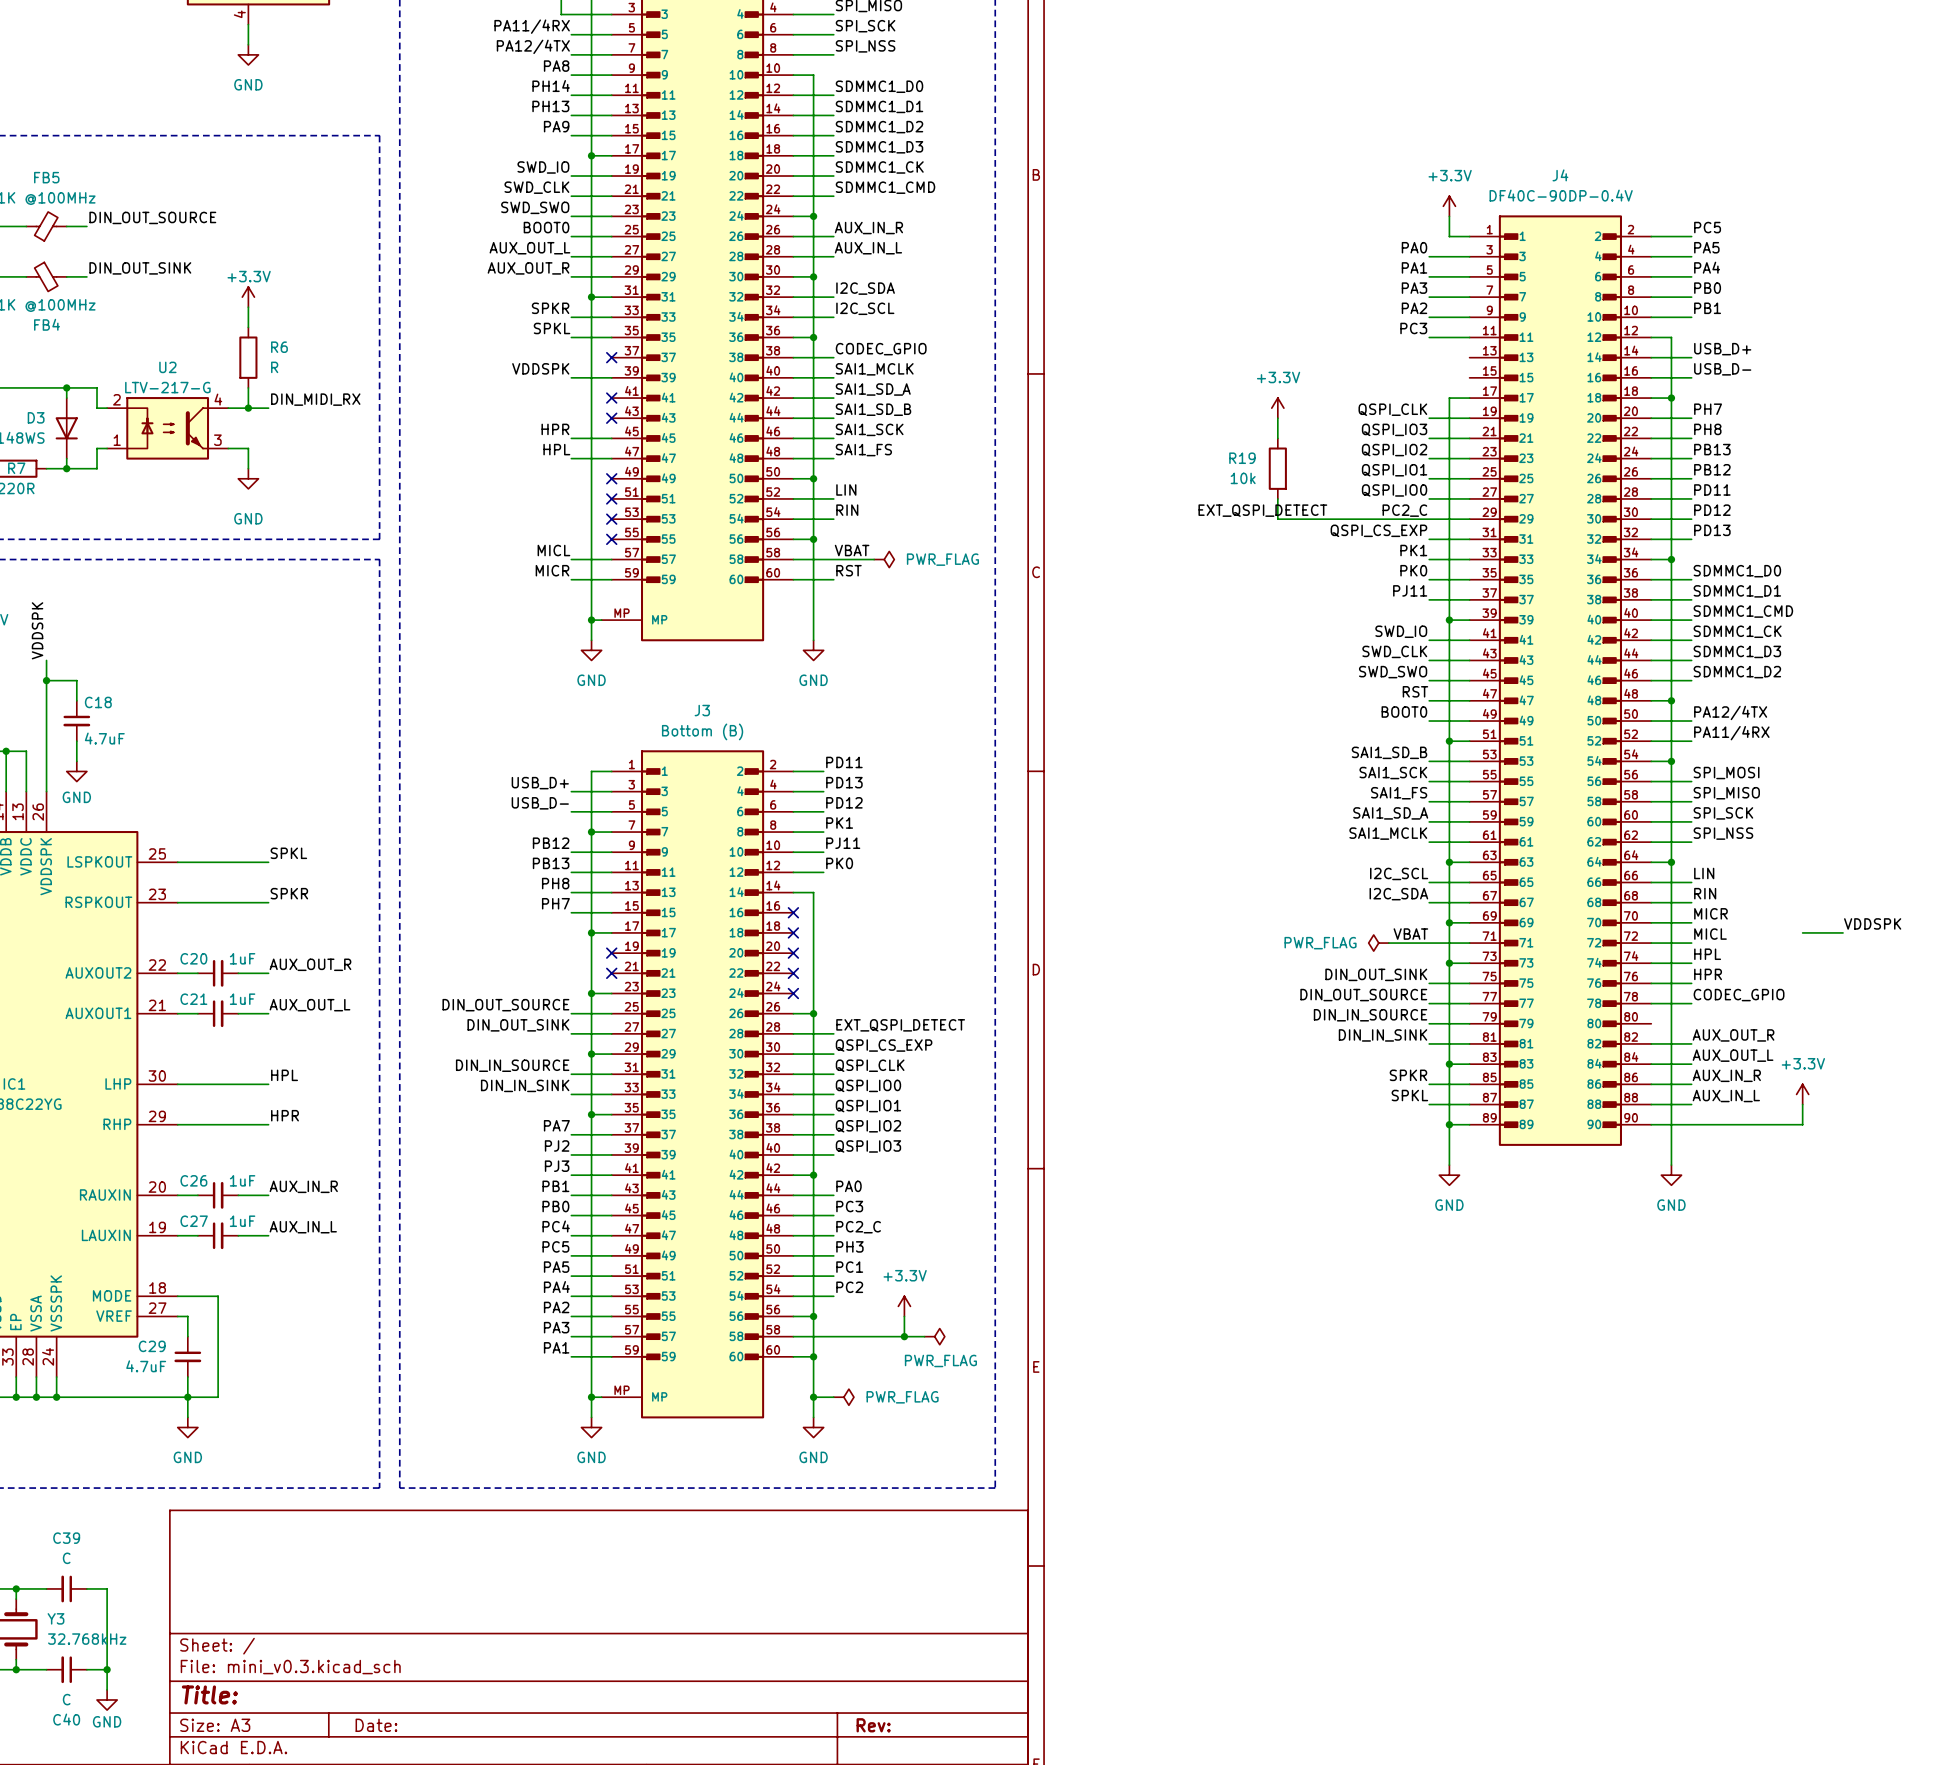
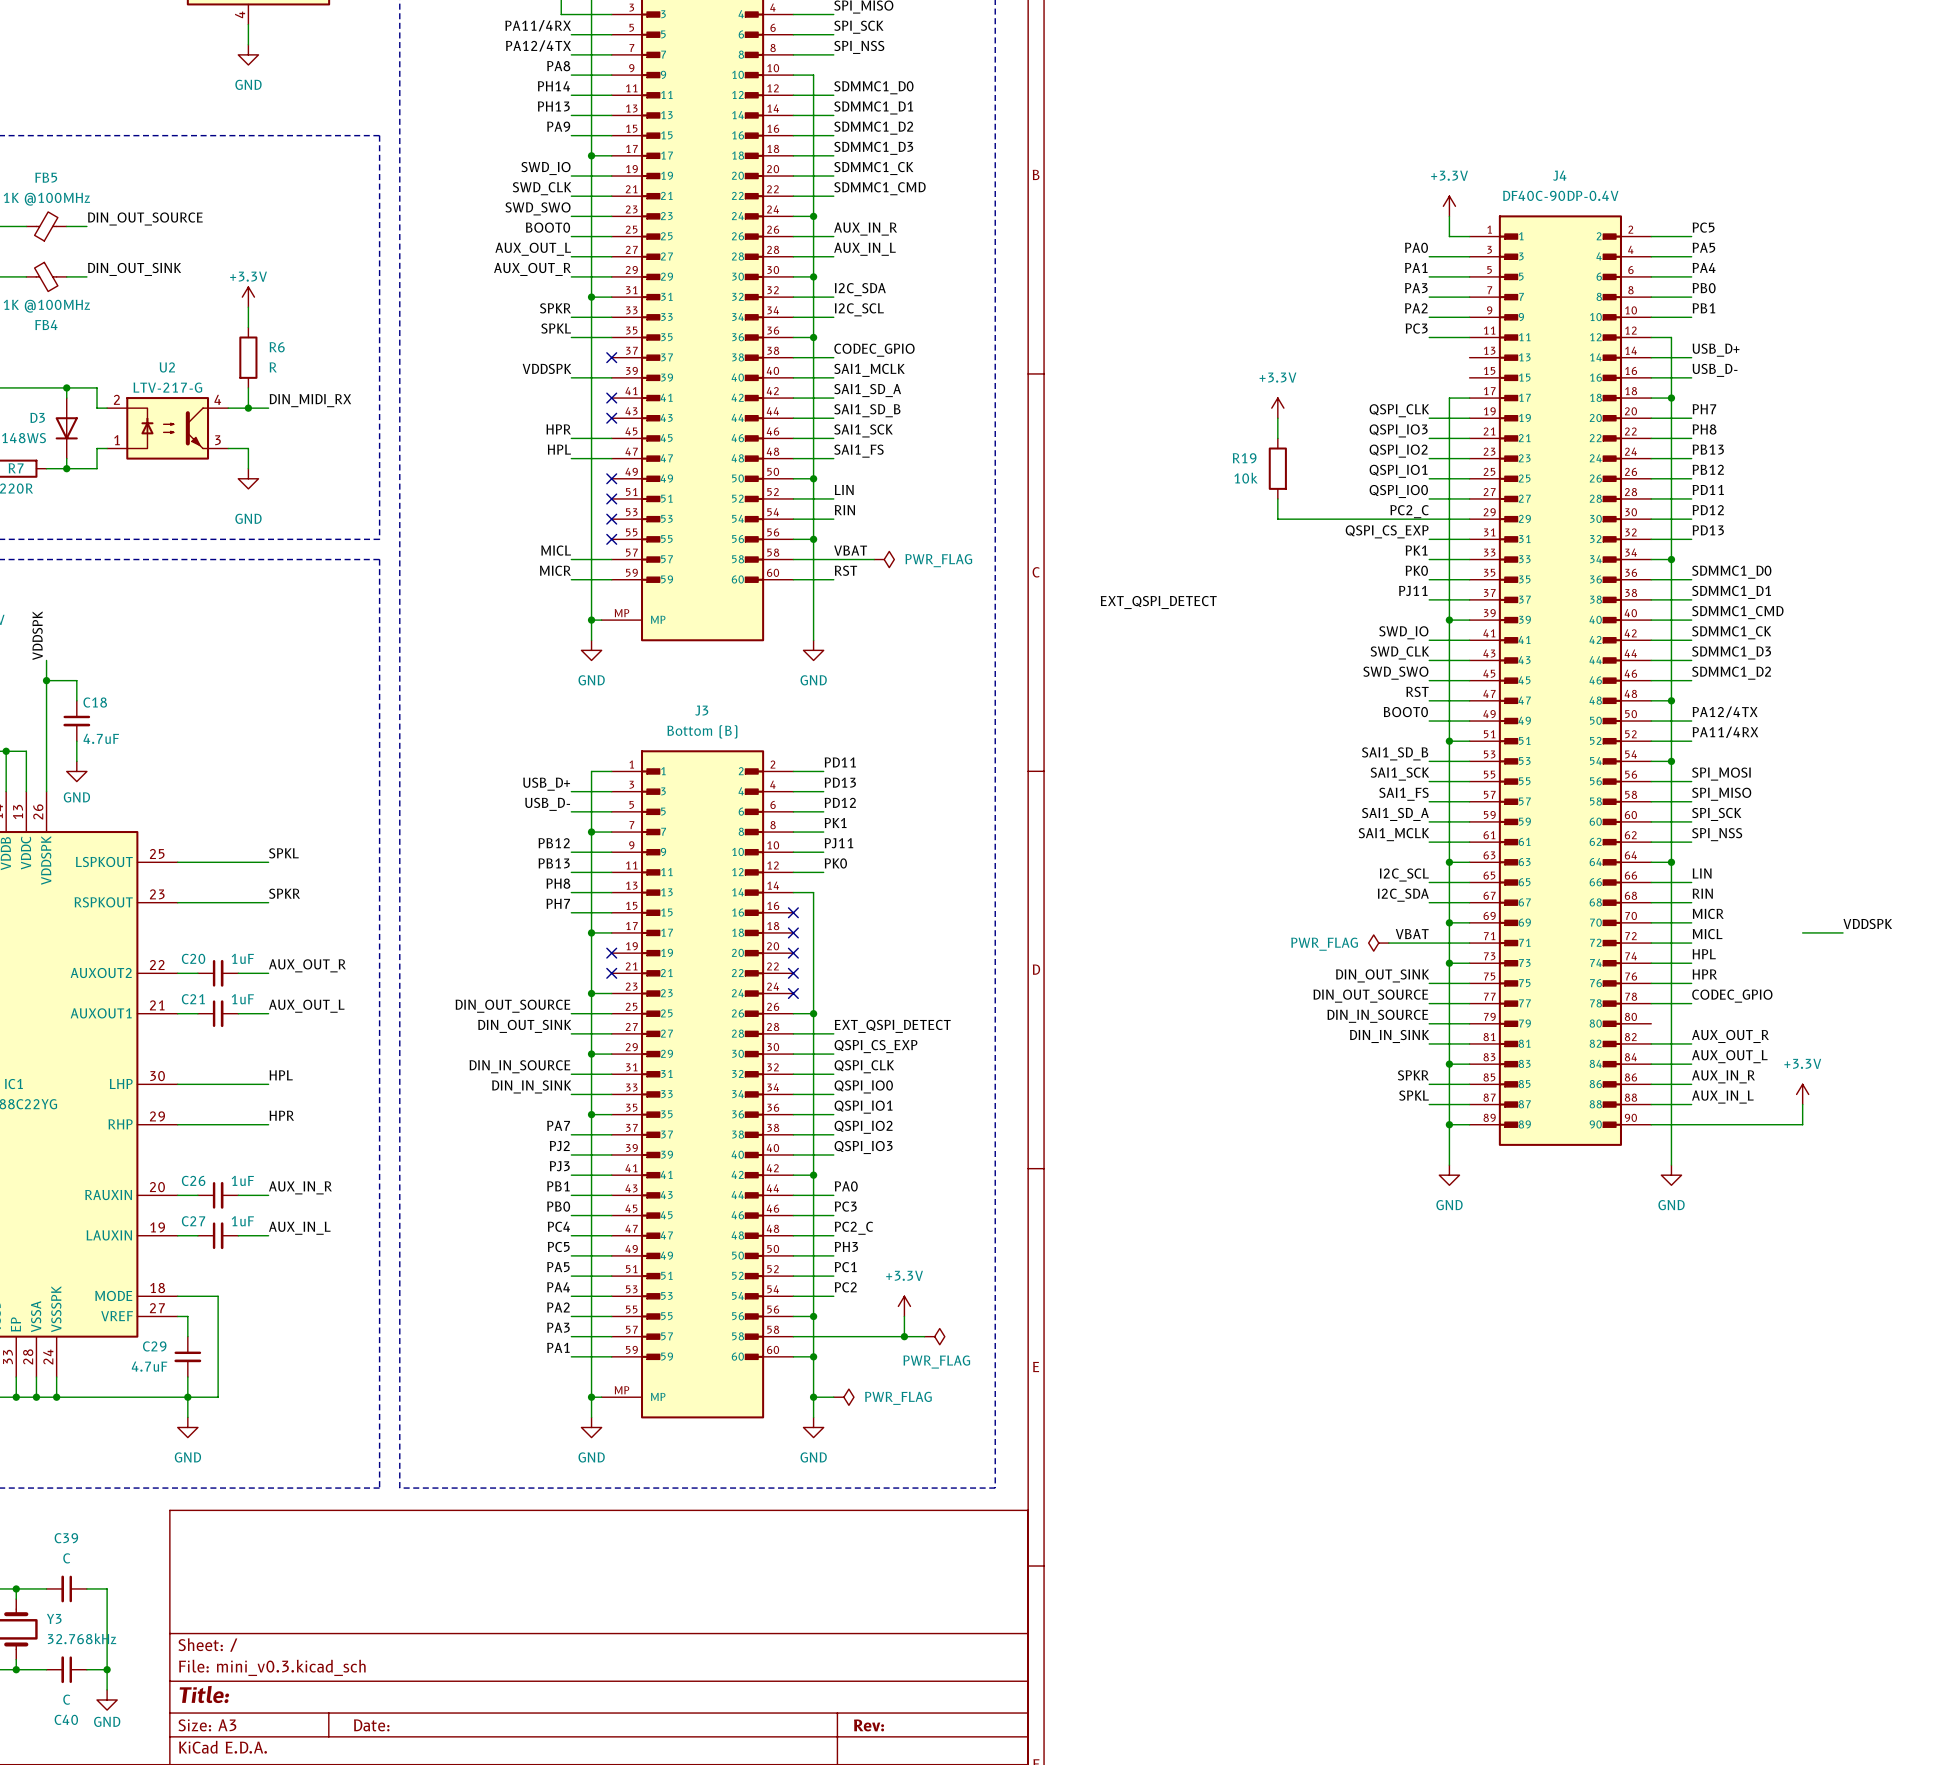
label position: EXT_QSPI_DETECT (1262, 510) -> EXT_QSPI_DETECT (1158, 602)

